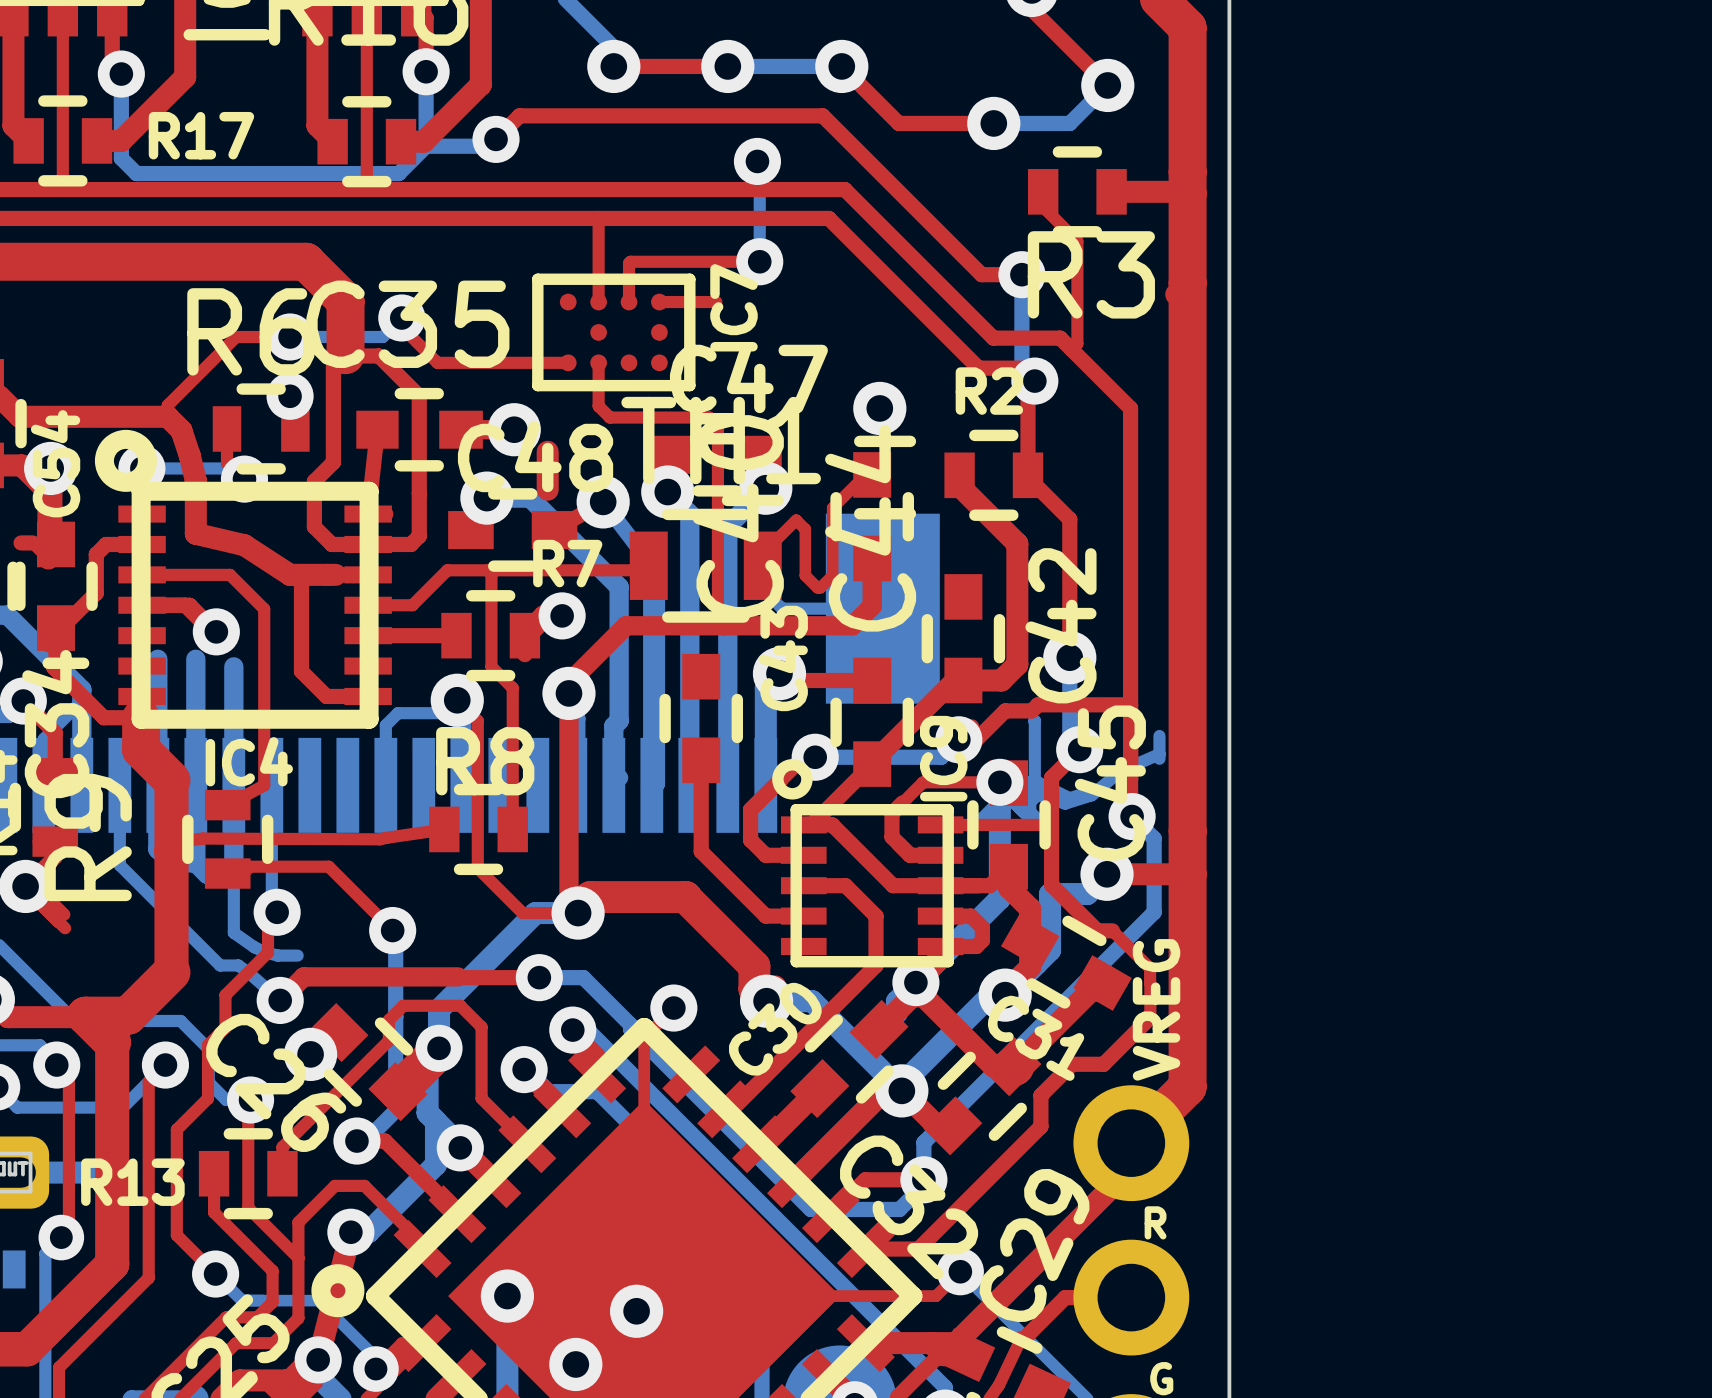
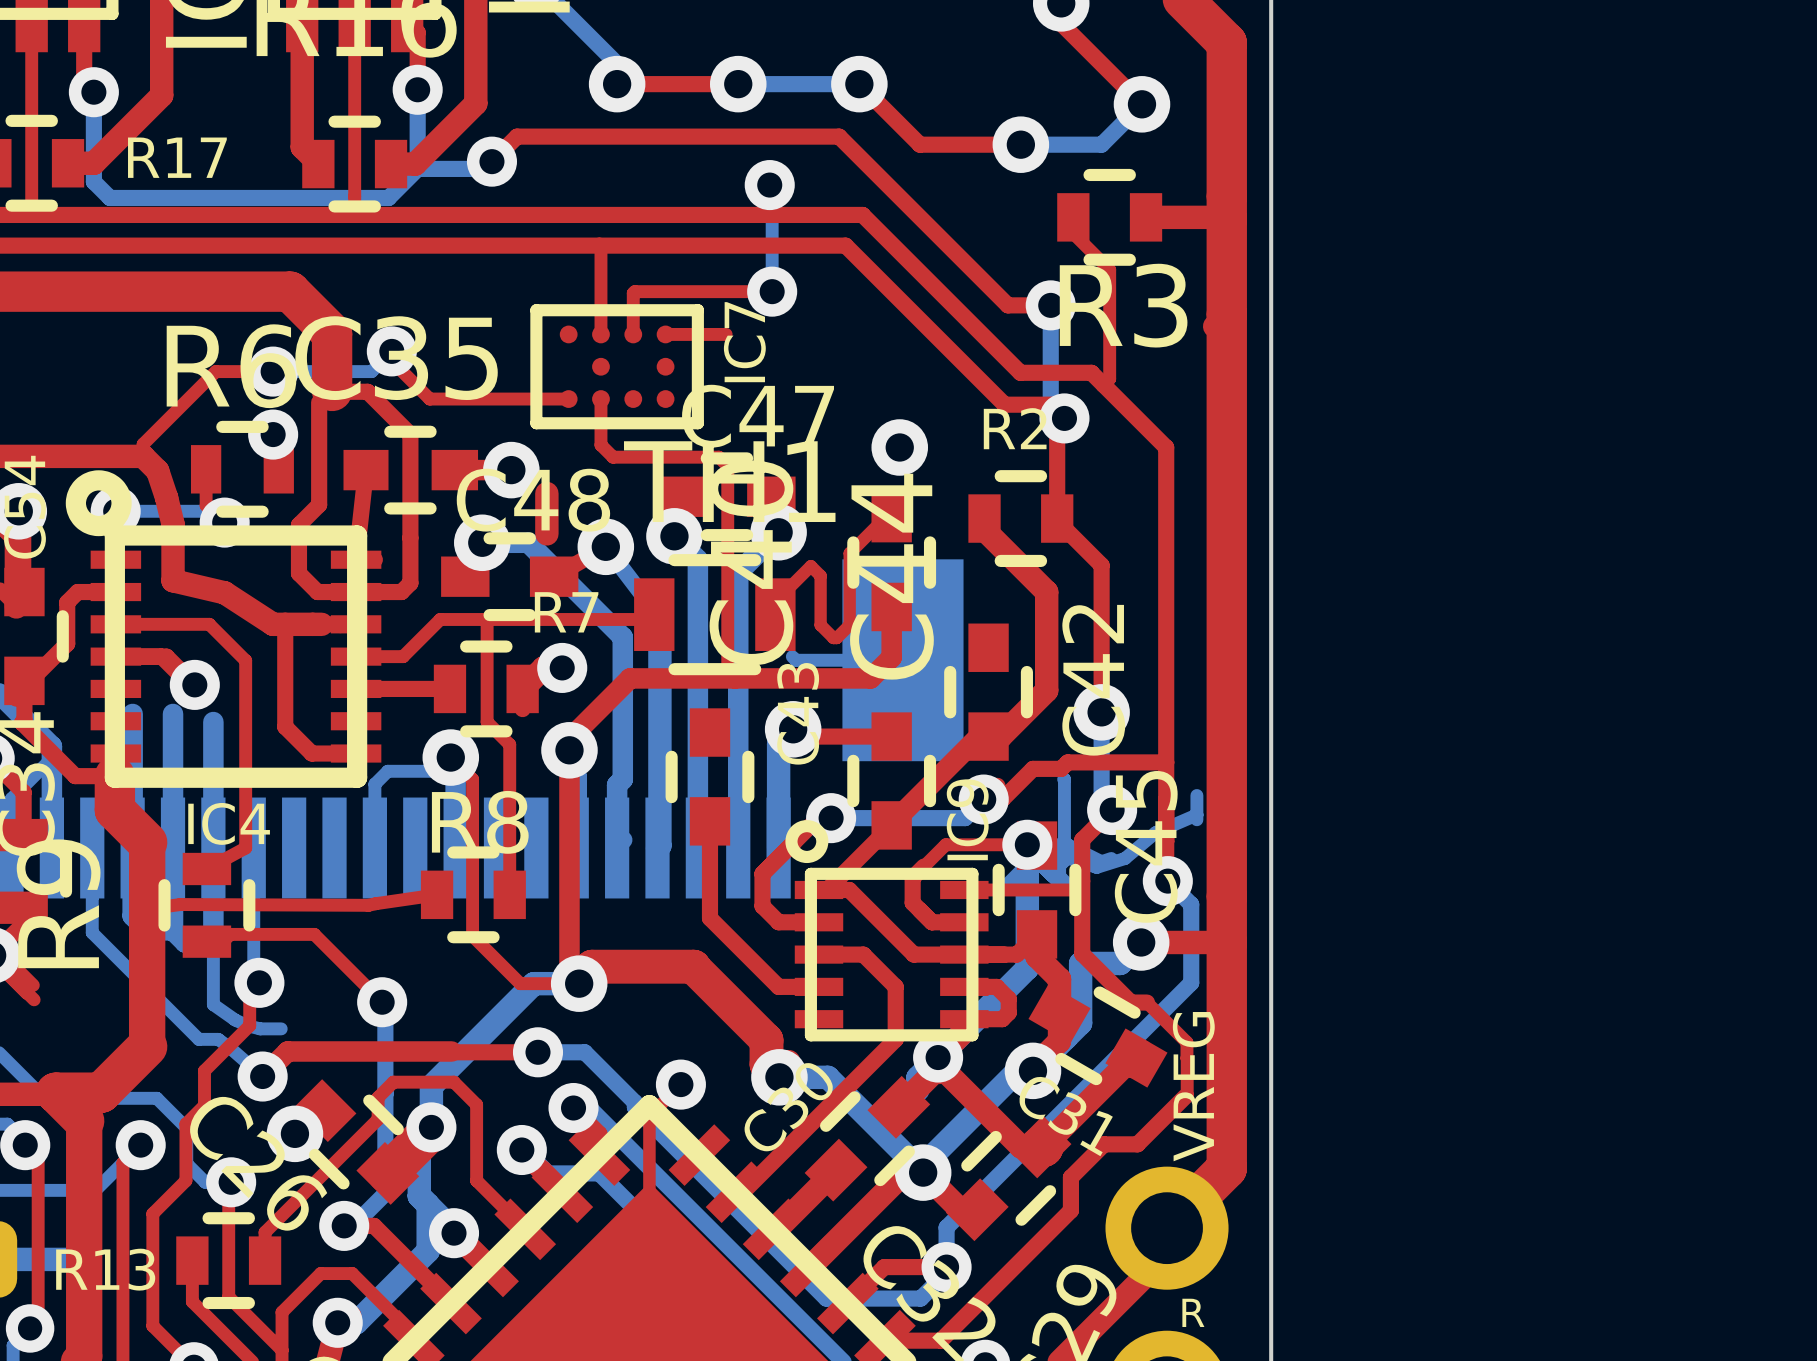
top track: (1017, 543) (1017, 664) (1001, 680) (974, 680) -> (1046, 592) (1046, 690) (1000, 736)

